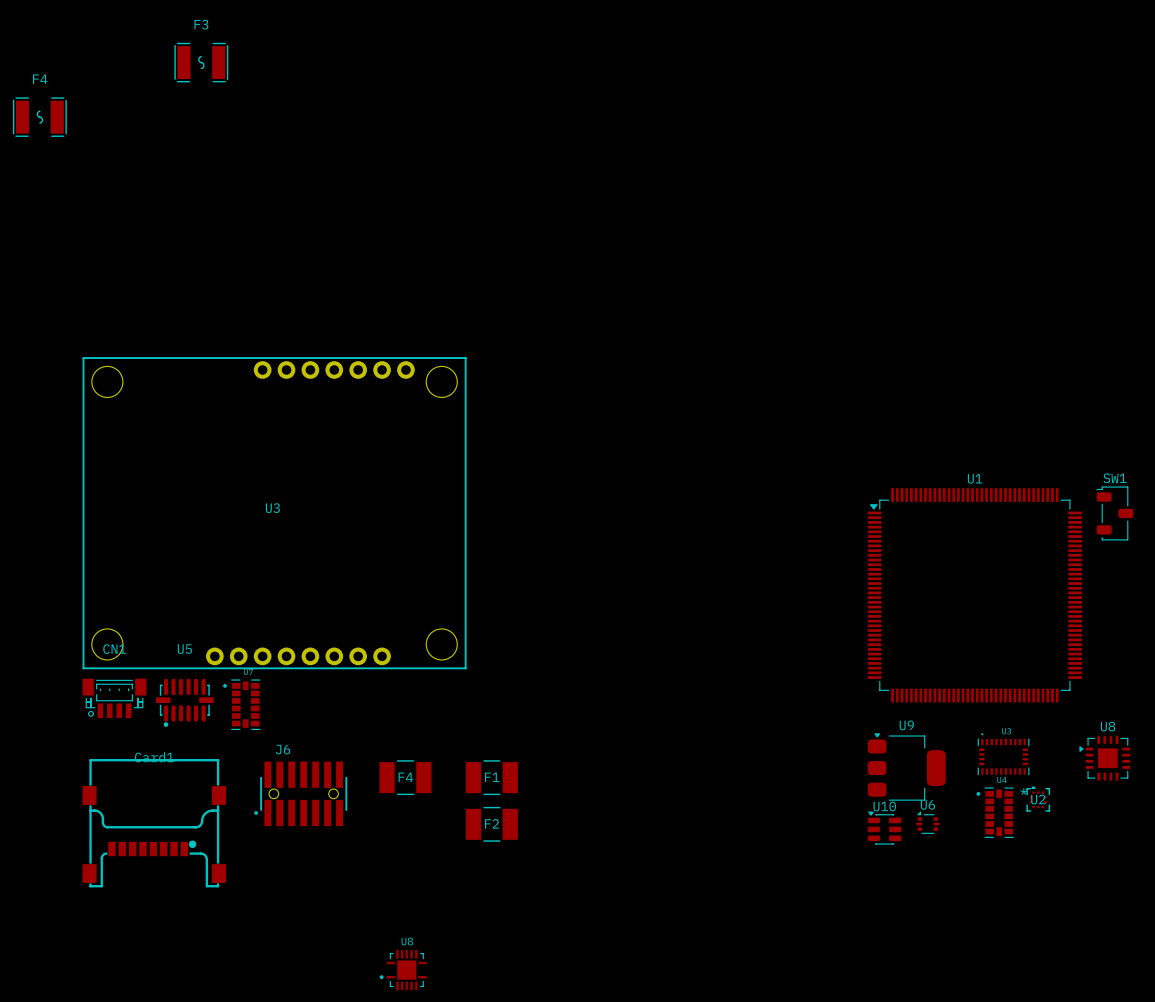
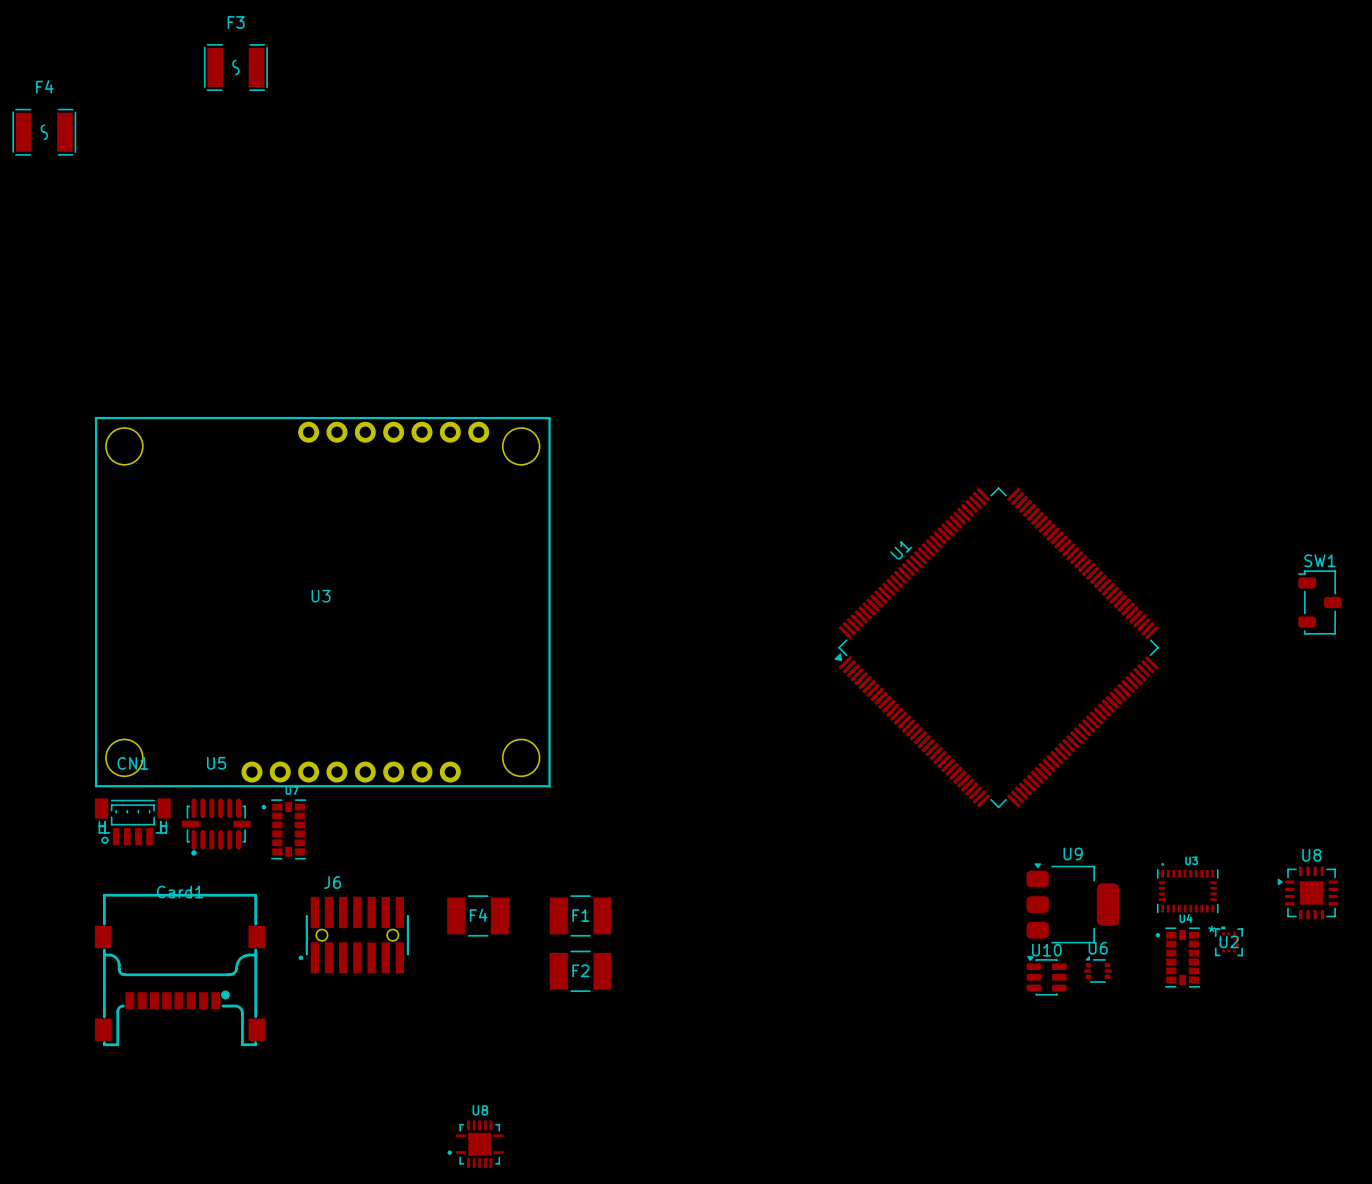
U1 rotation: 0° (974, 595) -> 45° counterclockwise (996, 647)
U1 position: (974, 595) -> (996, 647)

